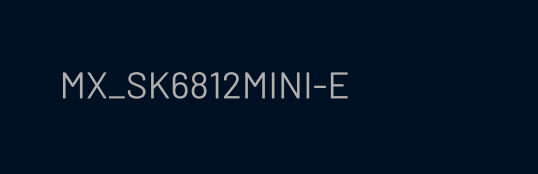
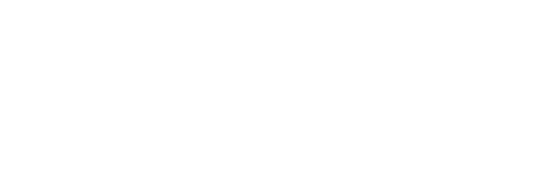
text: MX_SK6812MINI-E (205, 85) -> none

